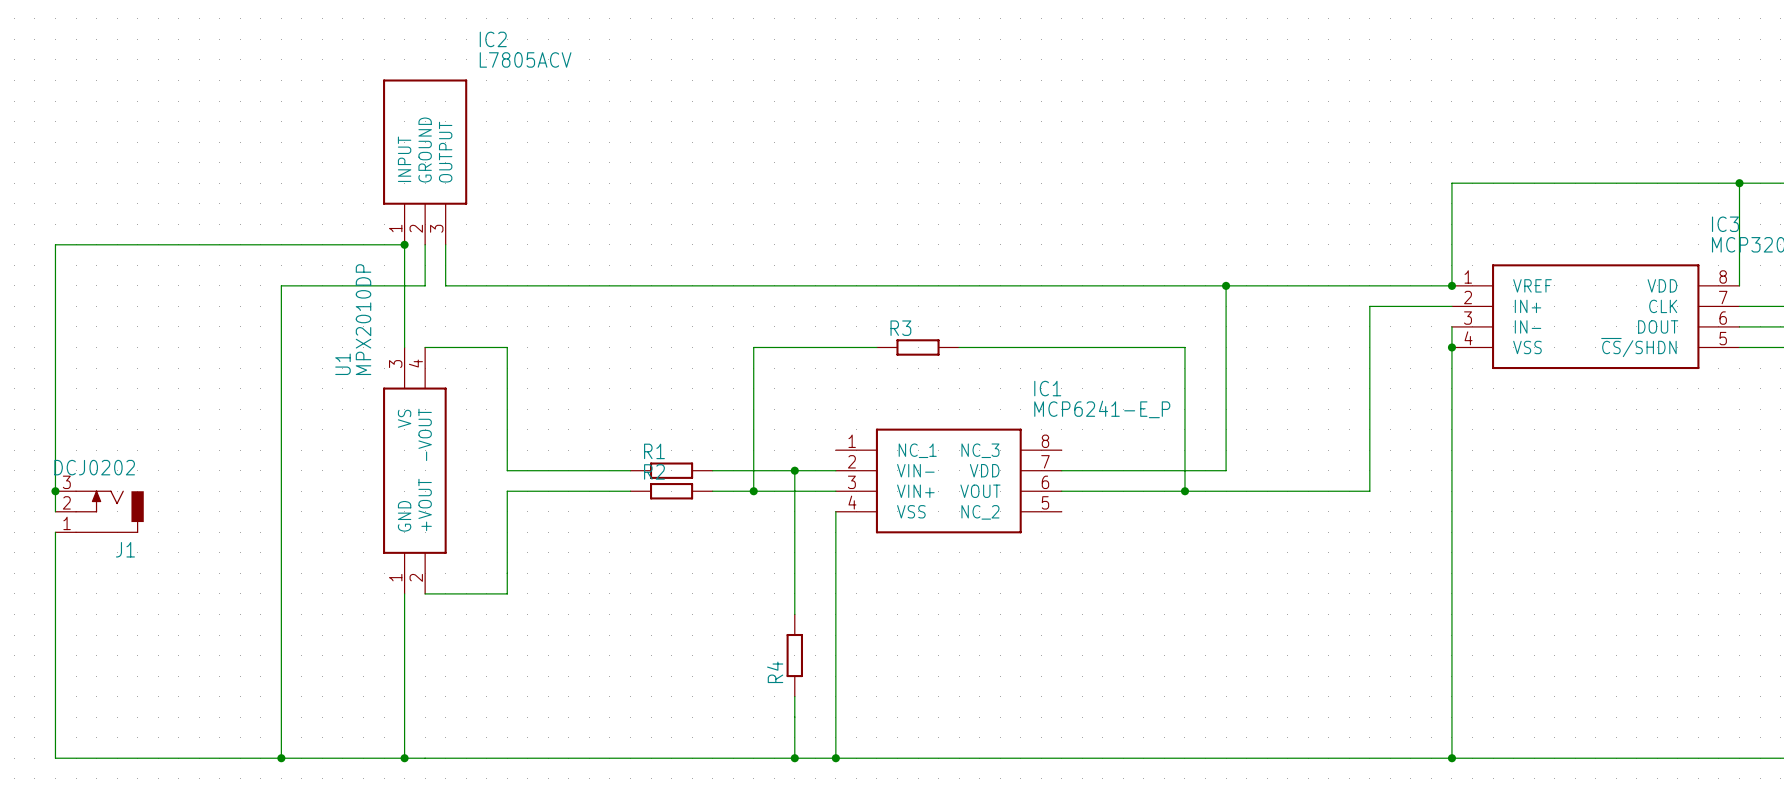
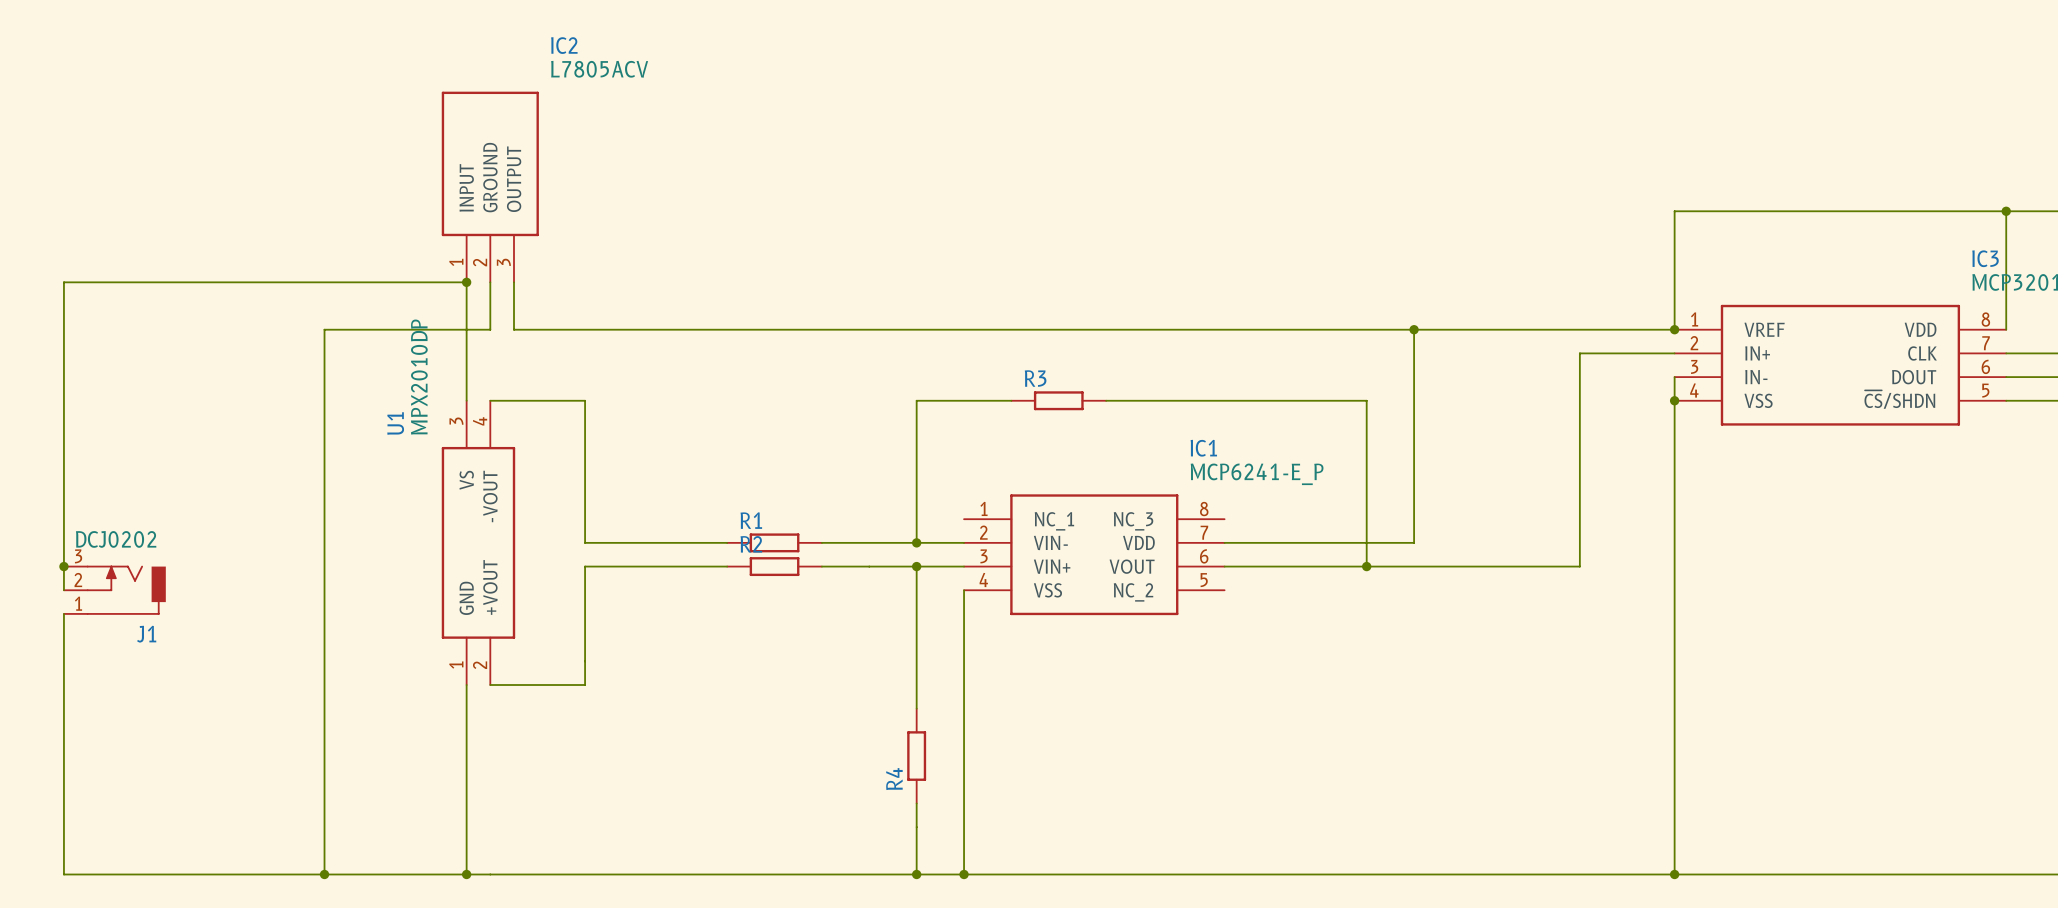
wire: (794, 347) (753, 347) (753, 491) -> (916, 400) (916, 542)
wire: (794, 470) (794, 491) -> none
junction position: (753, 491) -> (916, 566)

